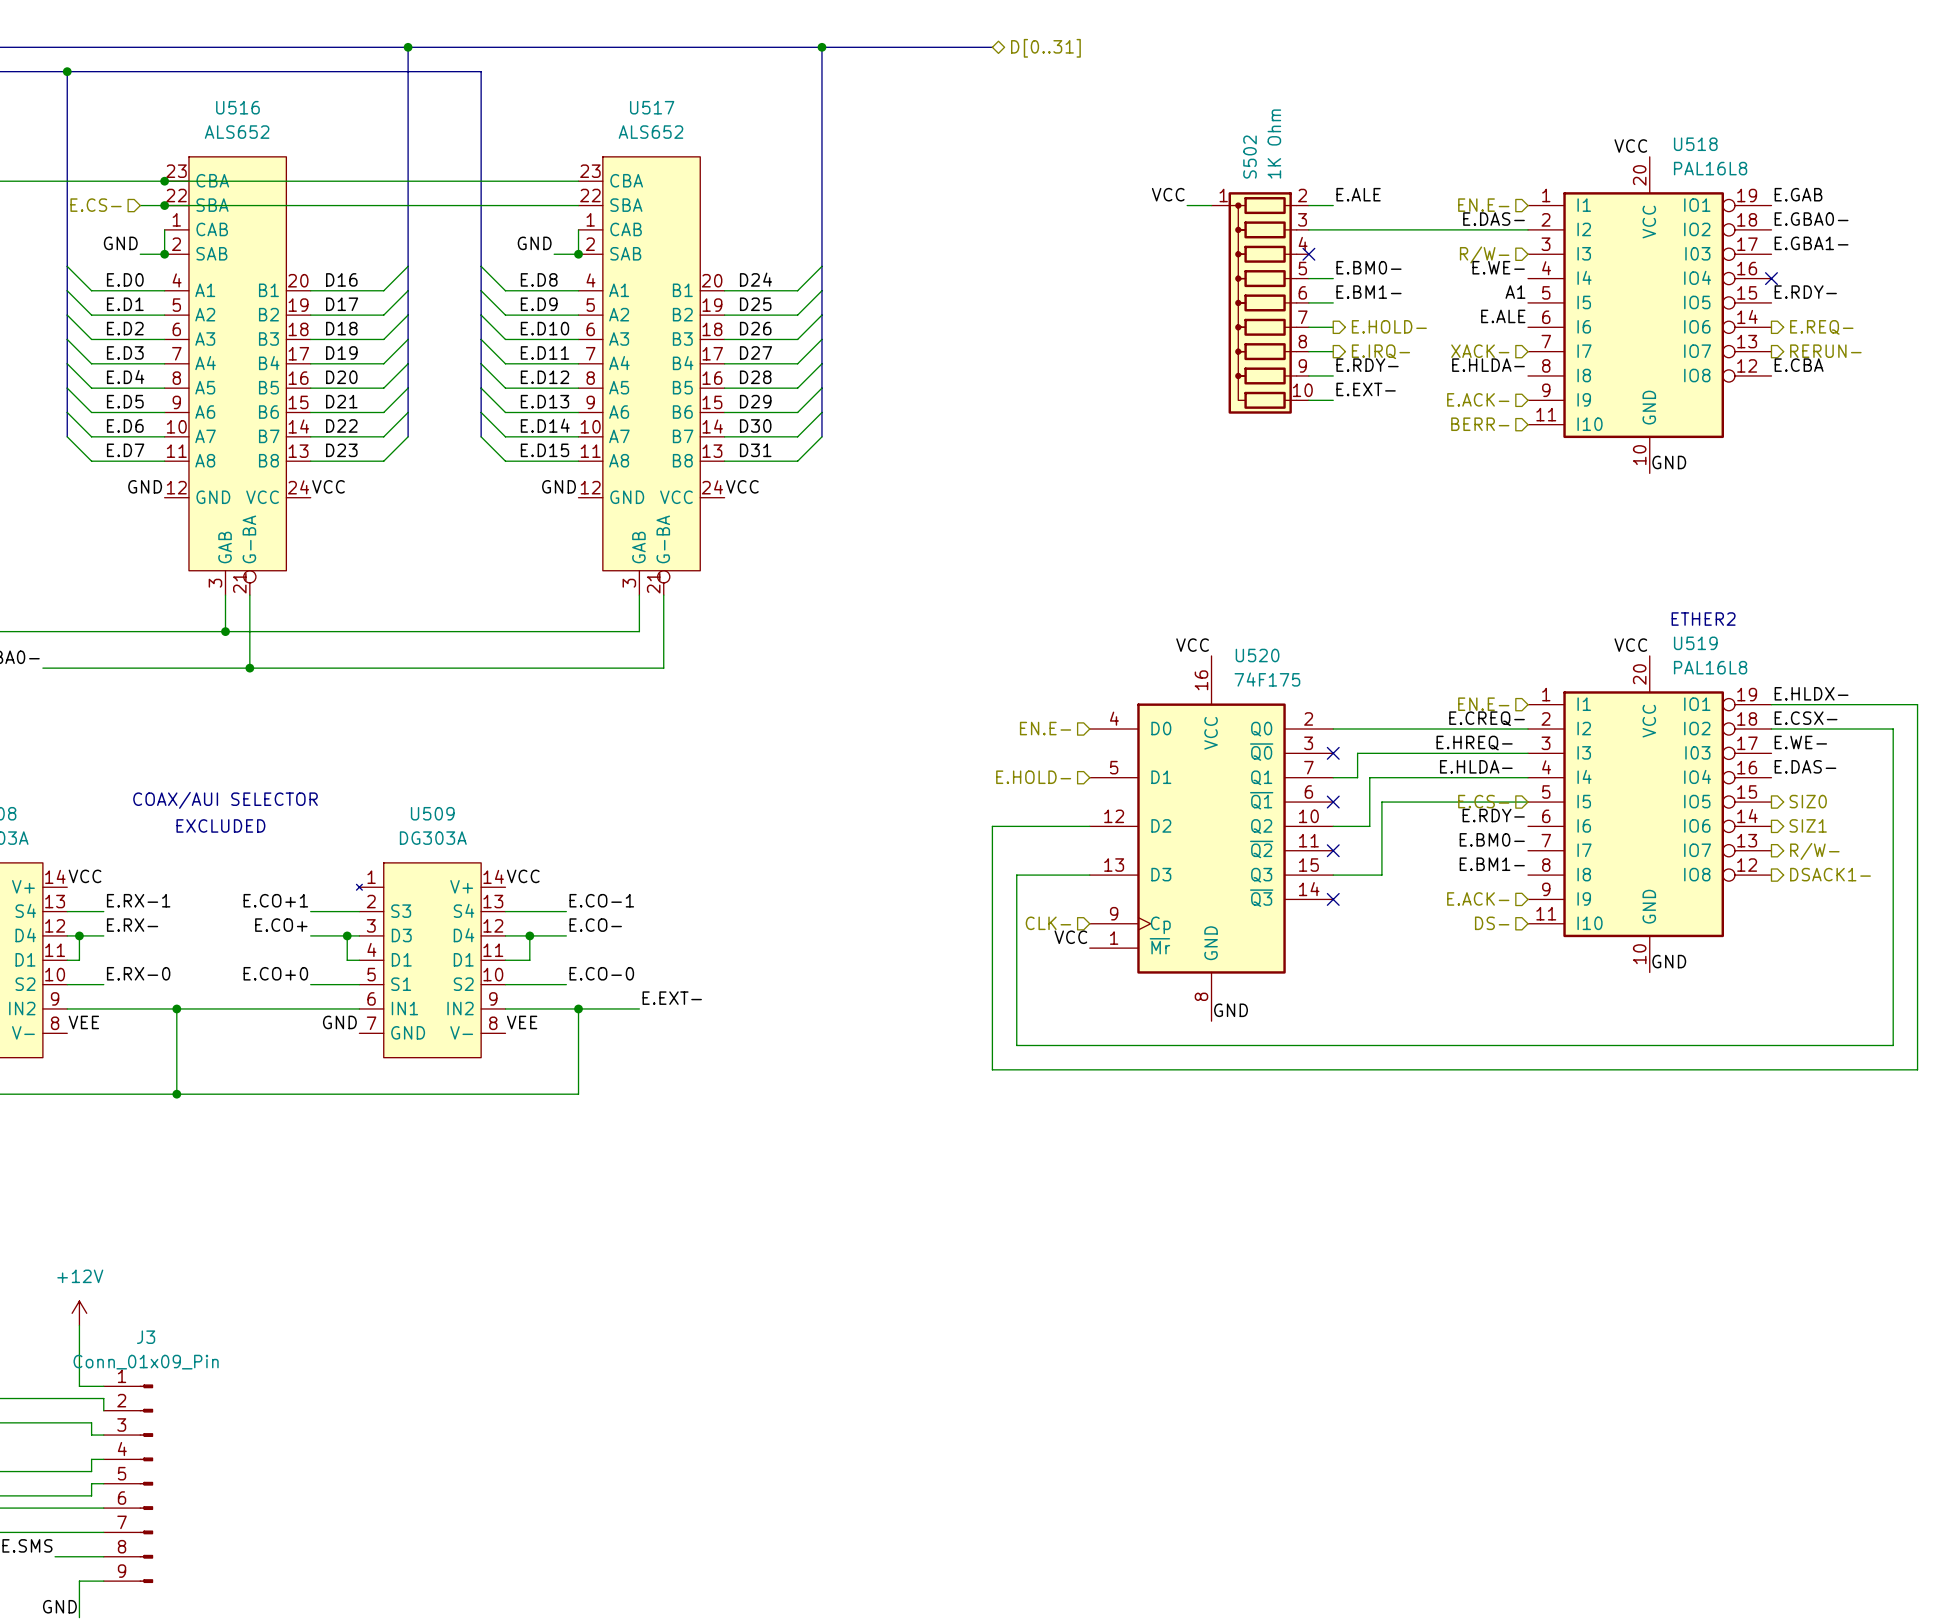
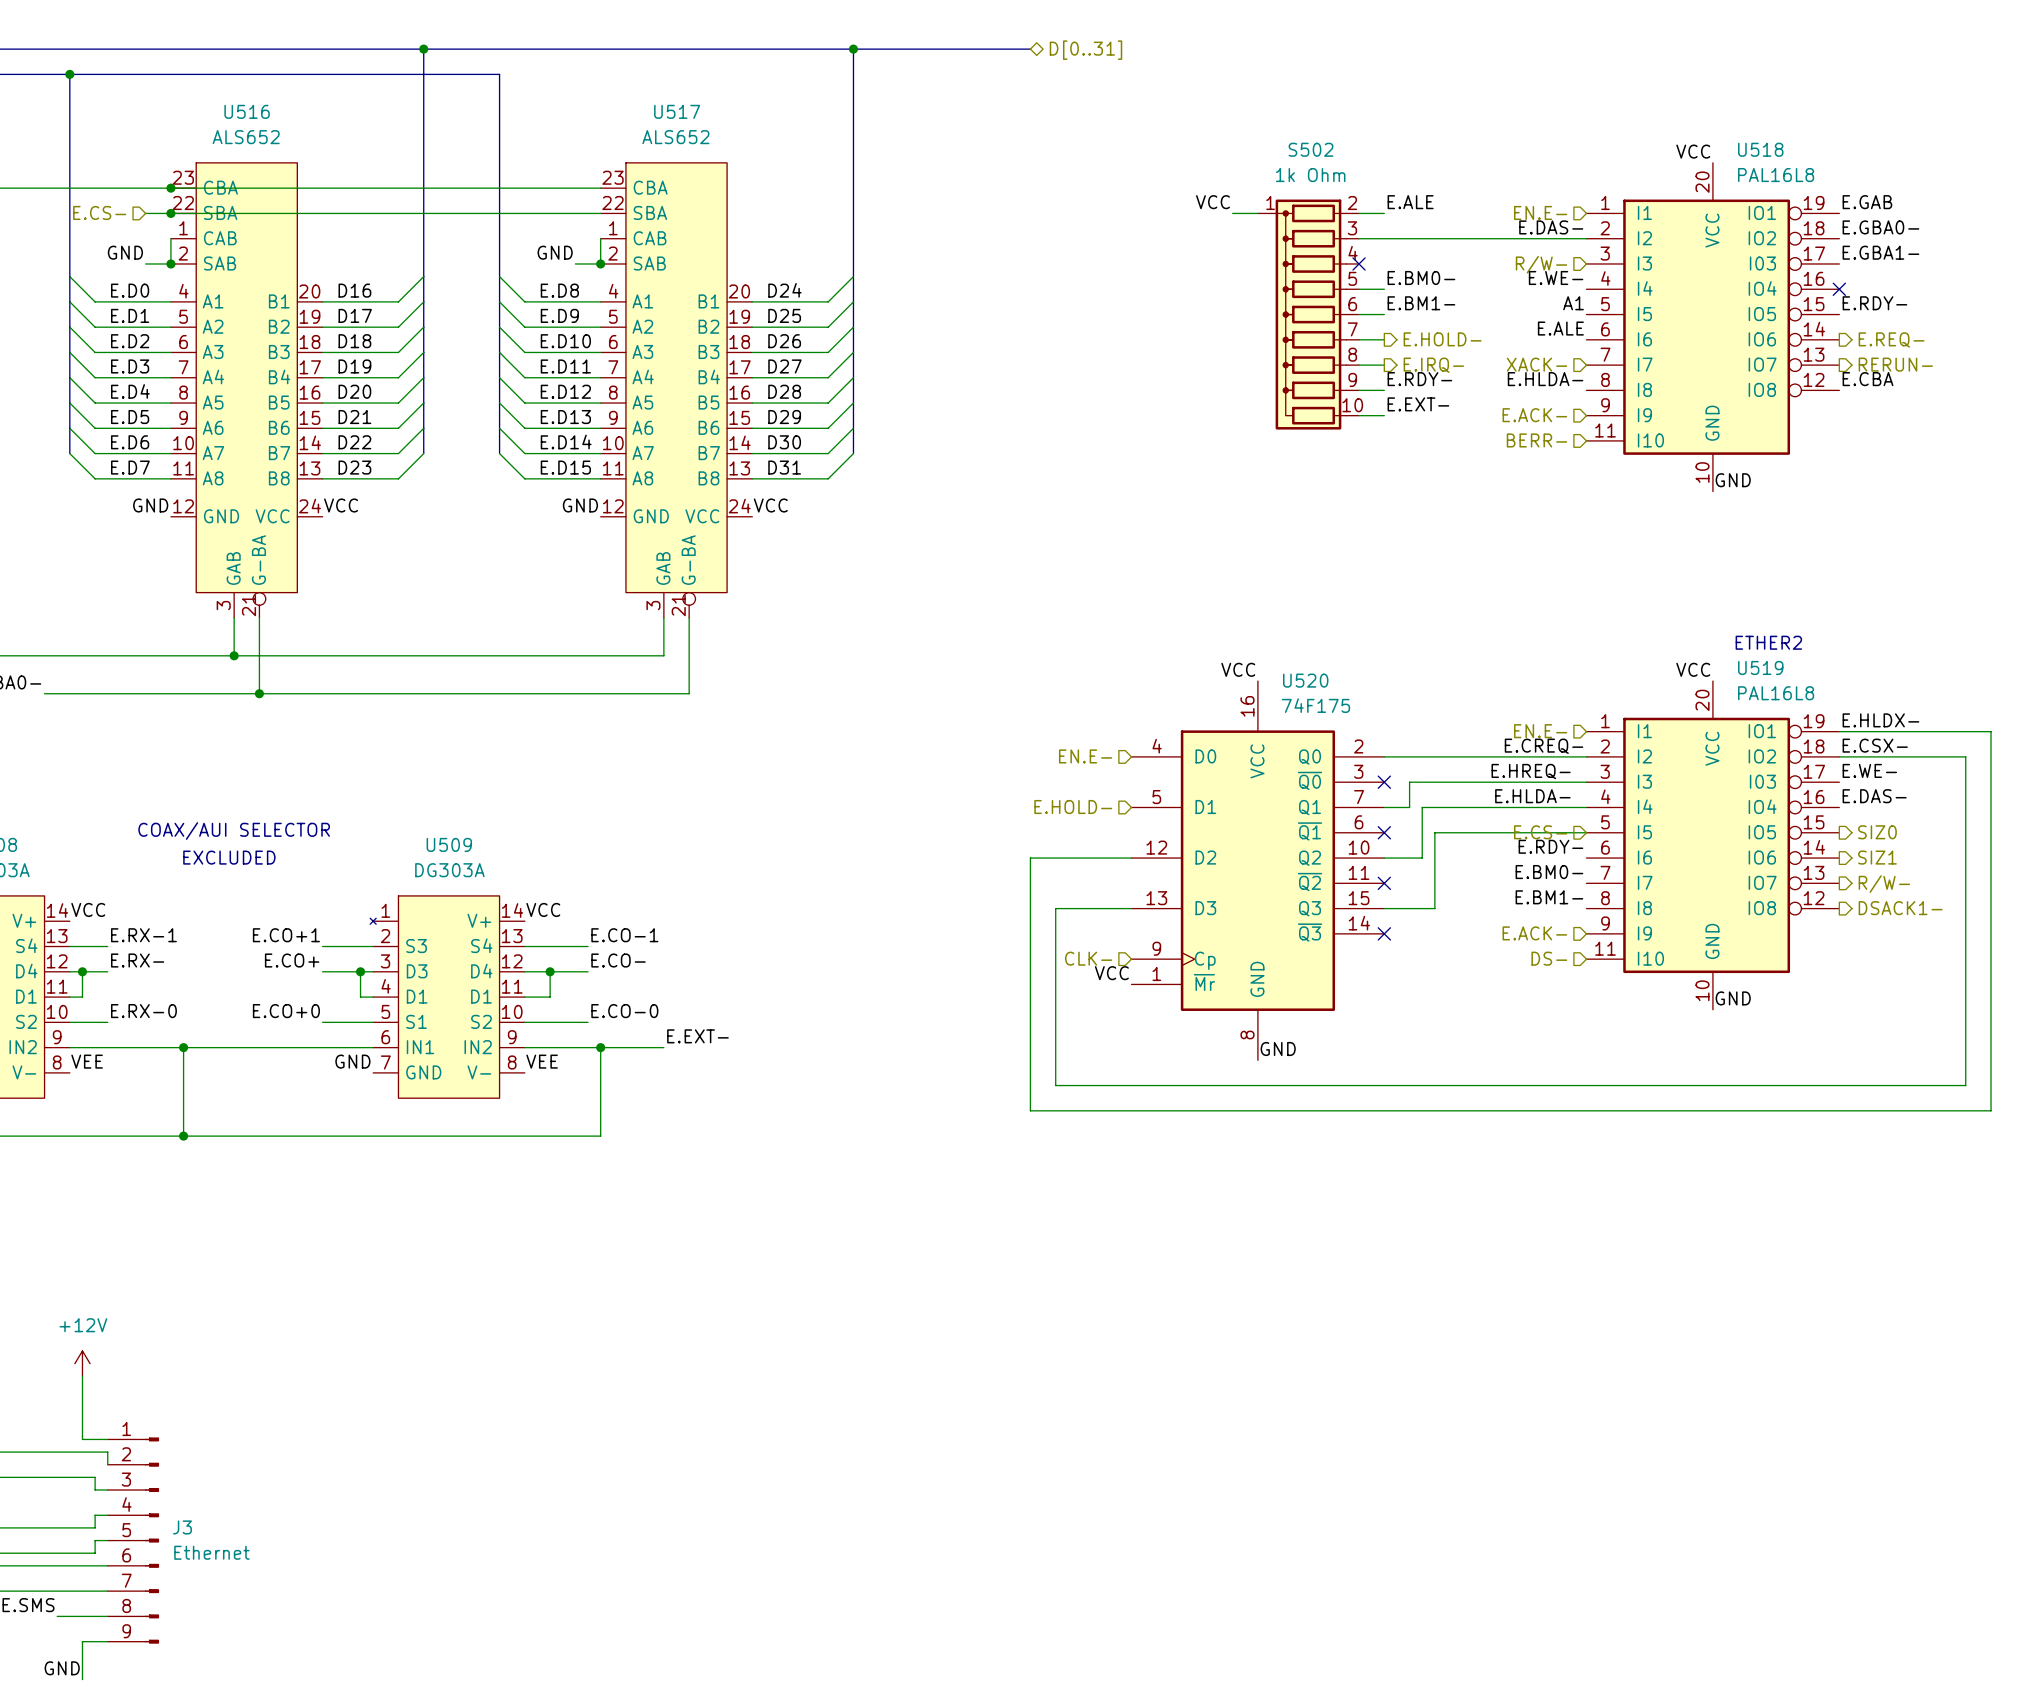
S502 value: 1K Ohm (1274, 144) -> 1k Ohm (1310, 175)
S502 name rotation: 0° (1250, 157) -> 90° clockwise (1311, 149)
J3 name position: J3 (146, 1337) -> J3 (182, 1527)
J3 value: Conn_01x09_Pin (146, 1362) -> Ethernet (211, 1552)

